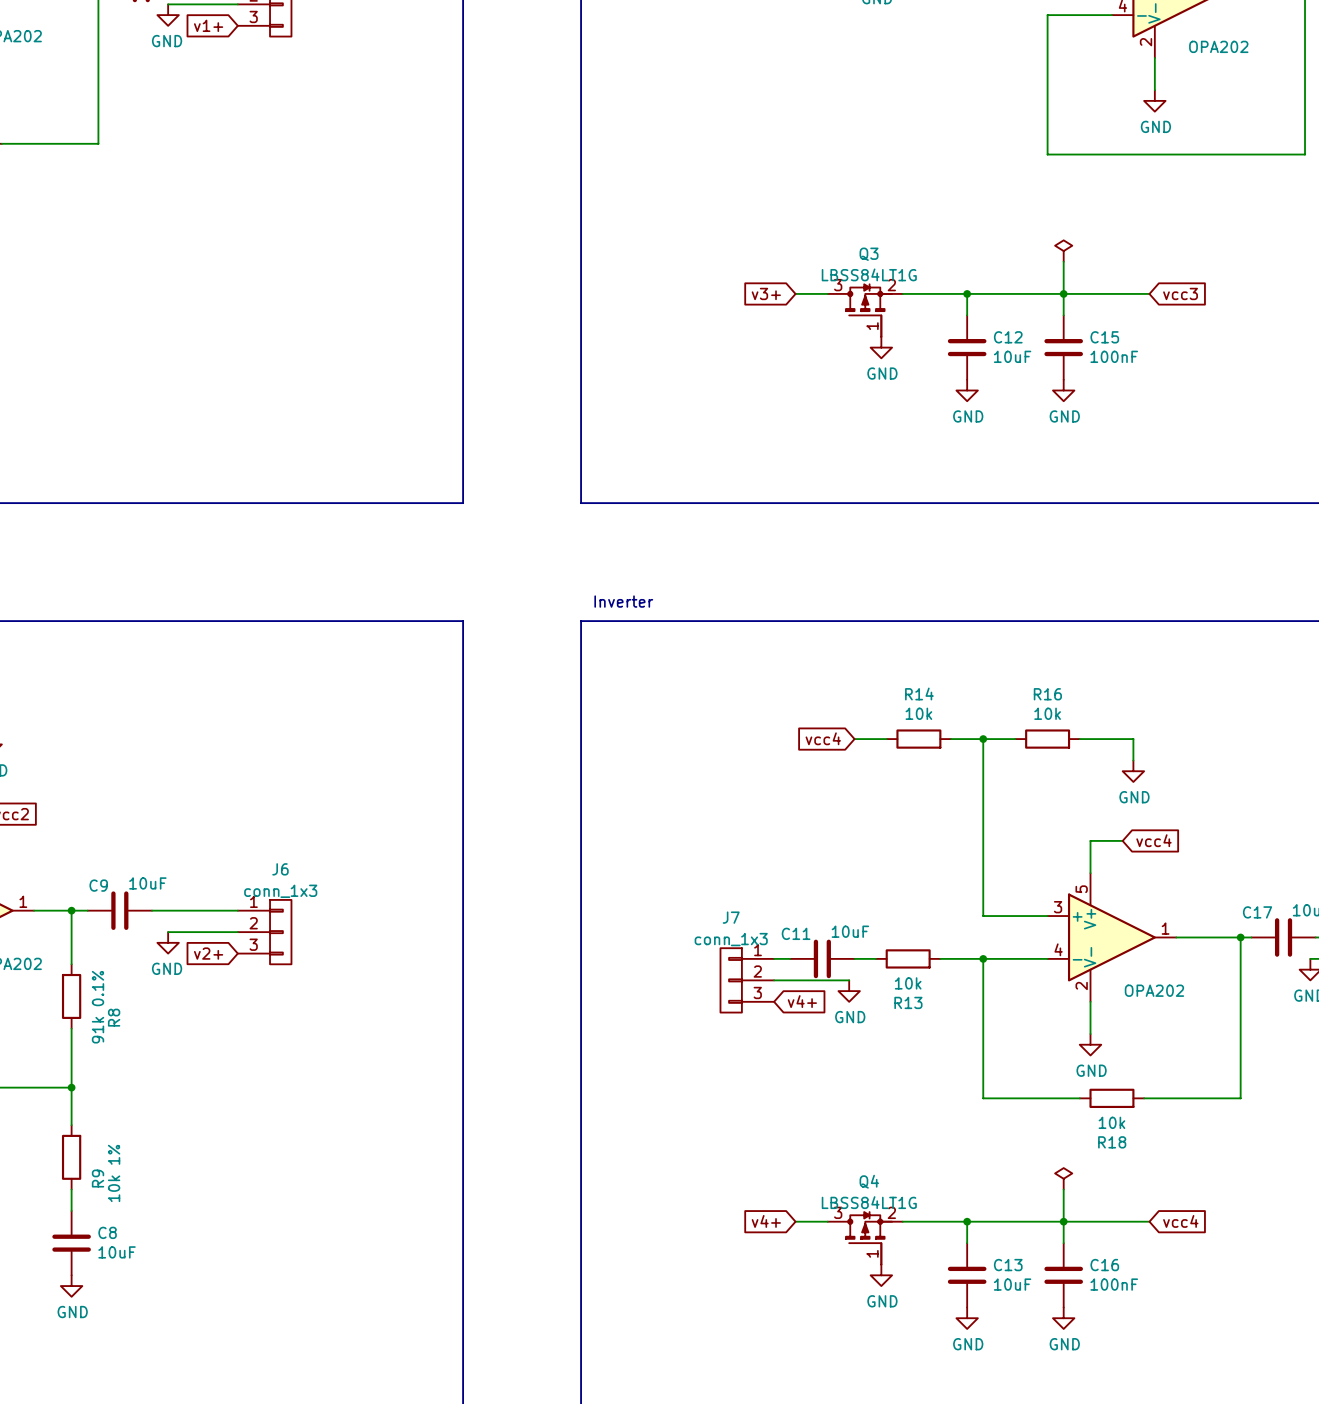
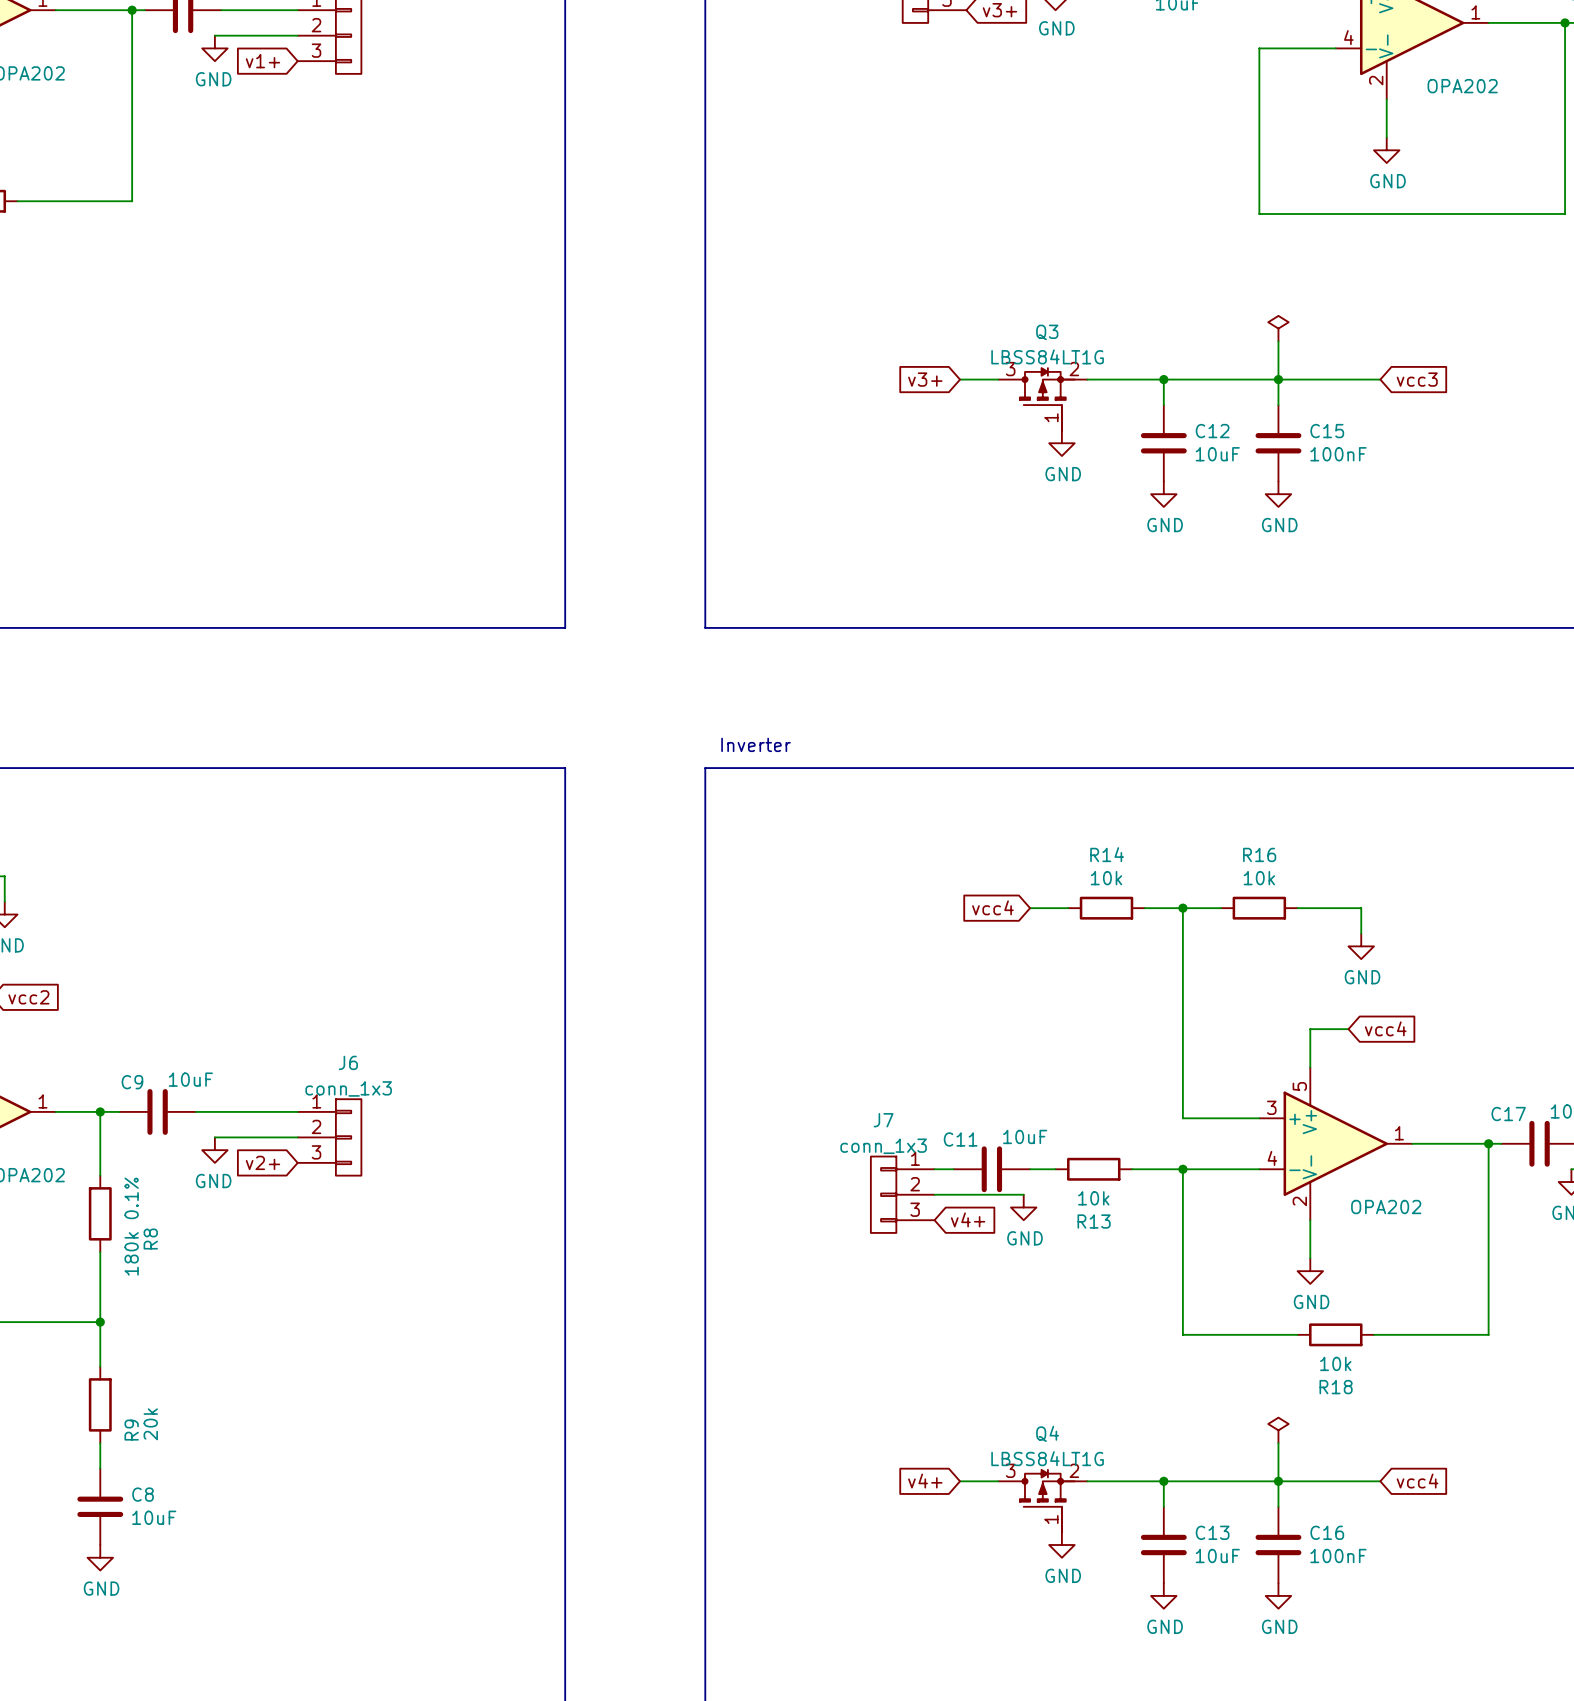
R8 value: 91k 0.1% (98, 1007) -> 180k 0.1% (131, 1226)
R9 value: 10k 1% (114, 1173) -> 20k (150, 1424)

